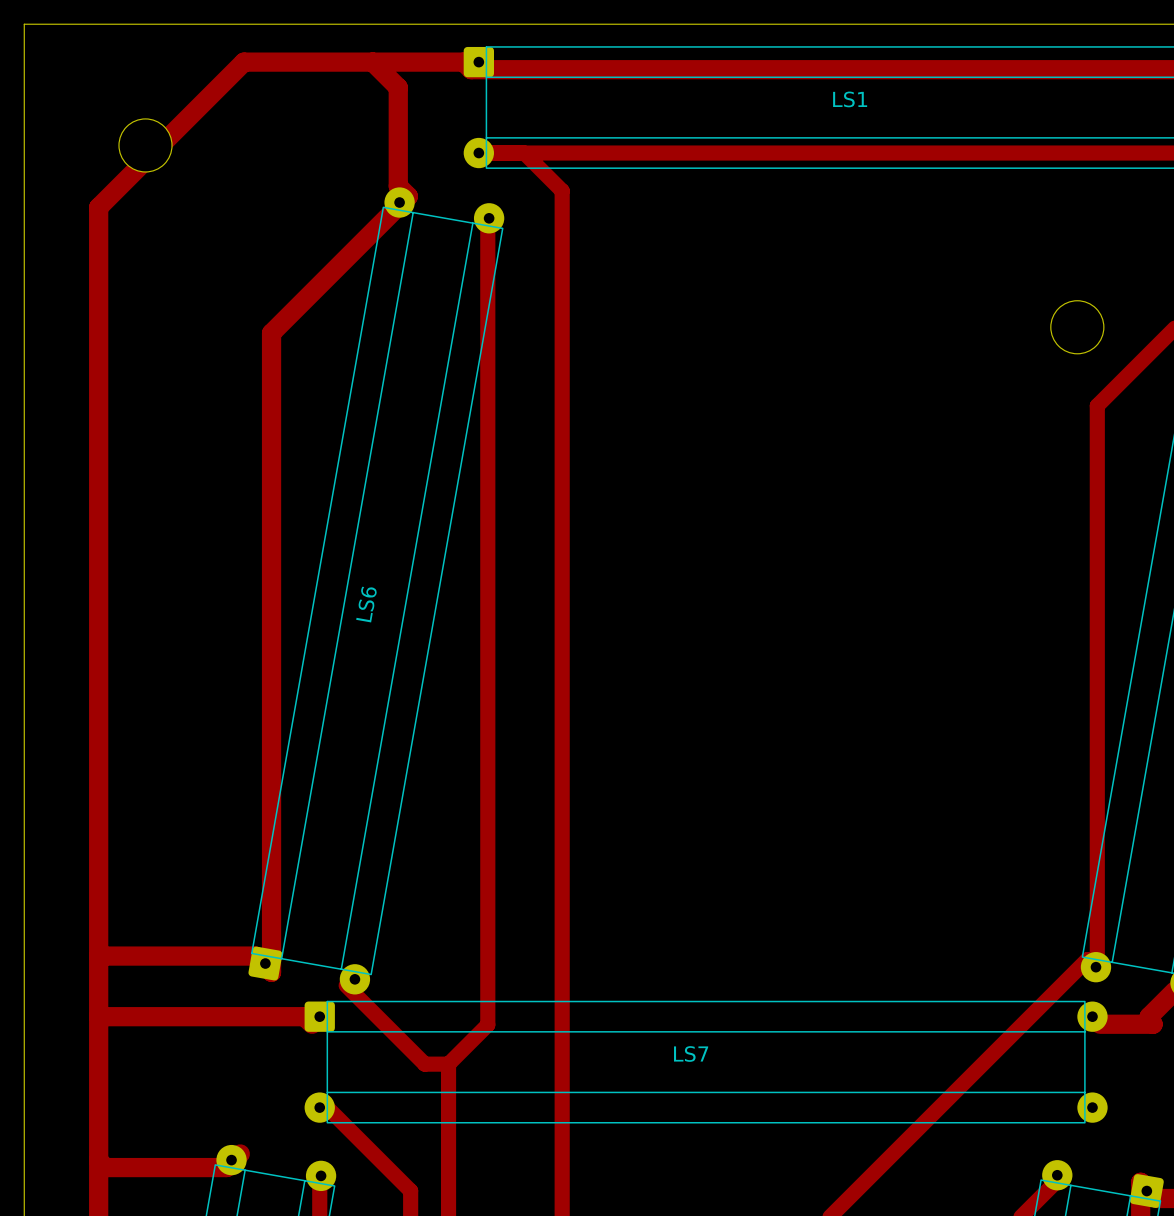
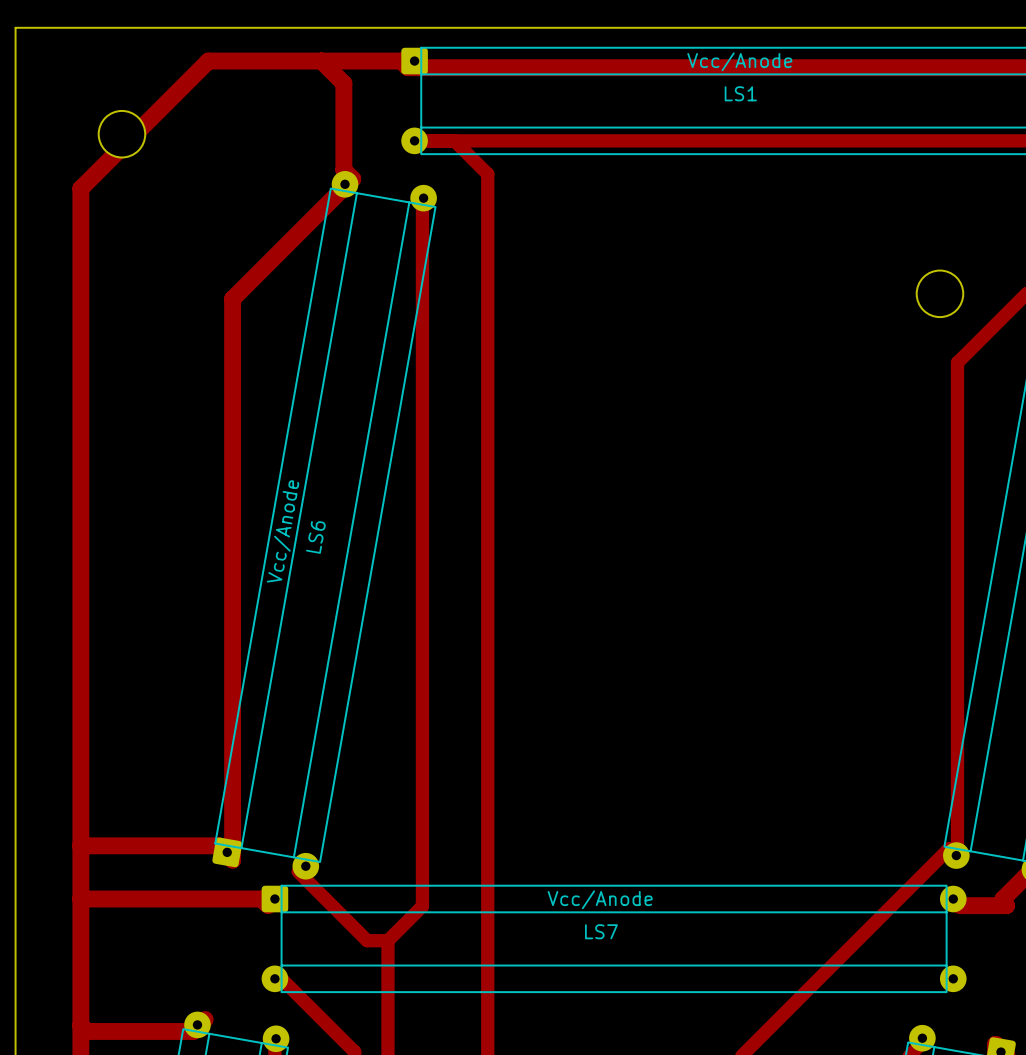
LS1 text: none -> Vcc/Anode (739, 61)
LS6 text: none -> Vcc/Anode (283, 531)
LS7 text: none -> Vcc/Anode (600, 899)

